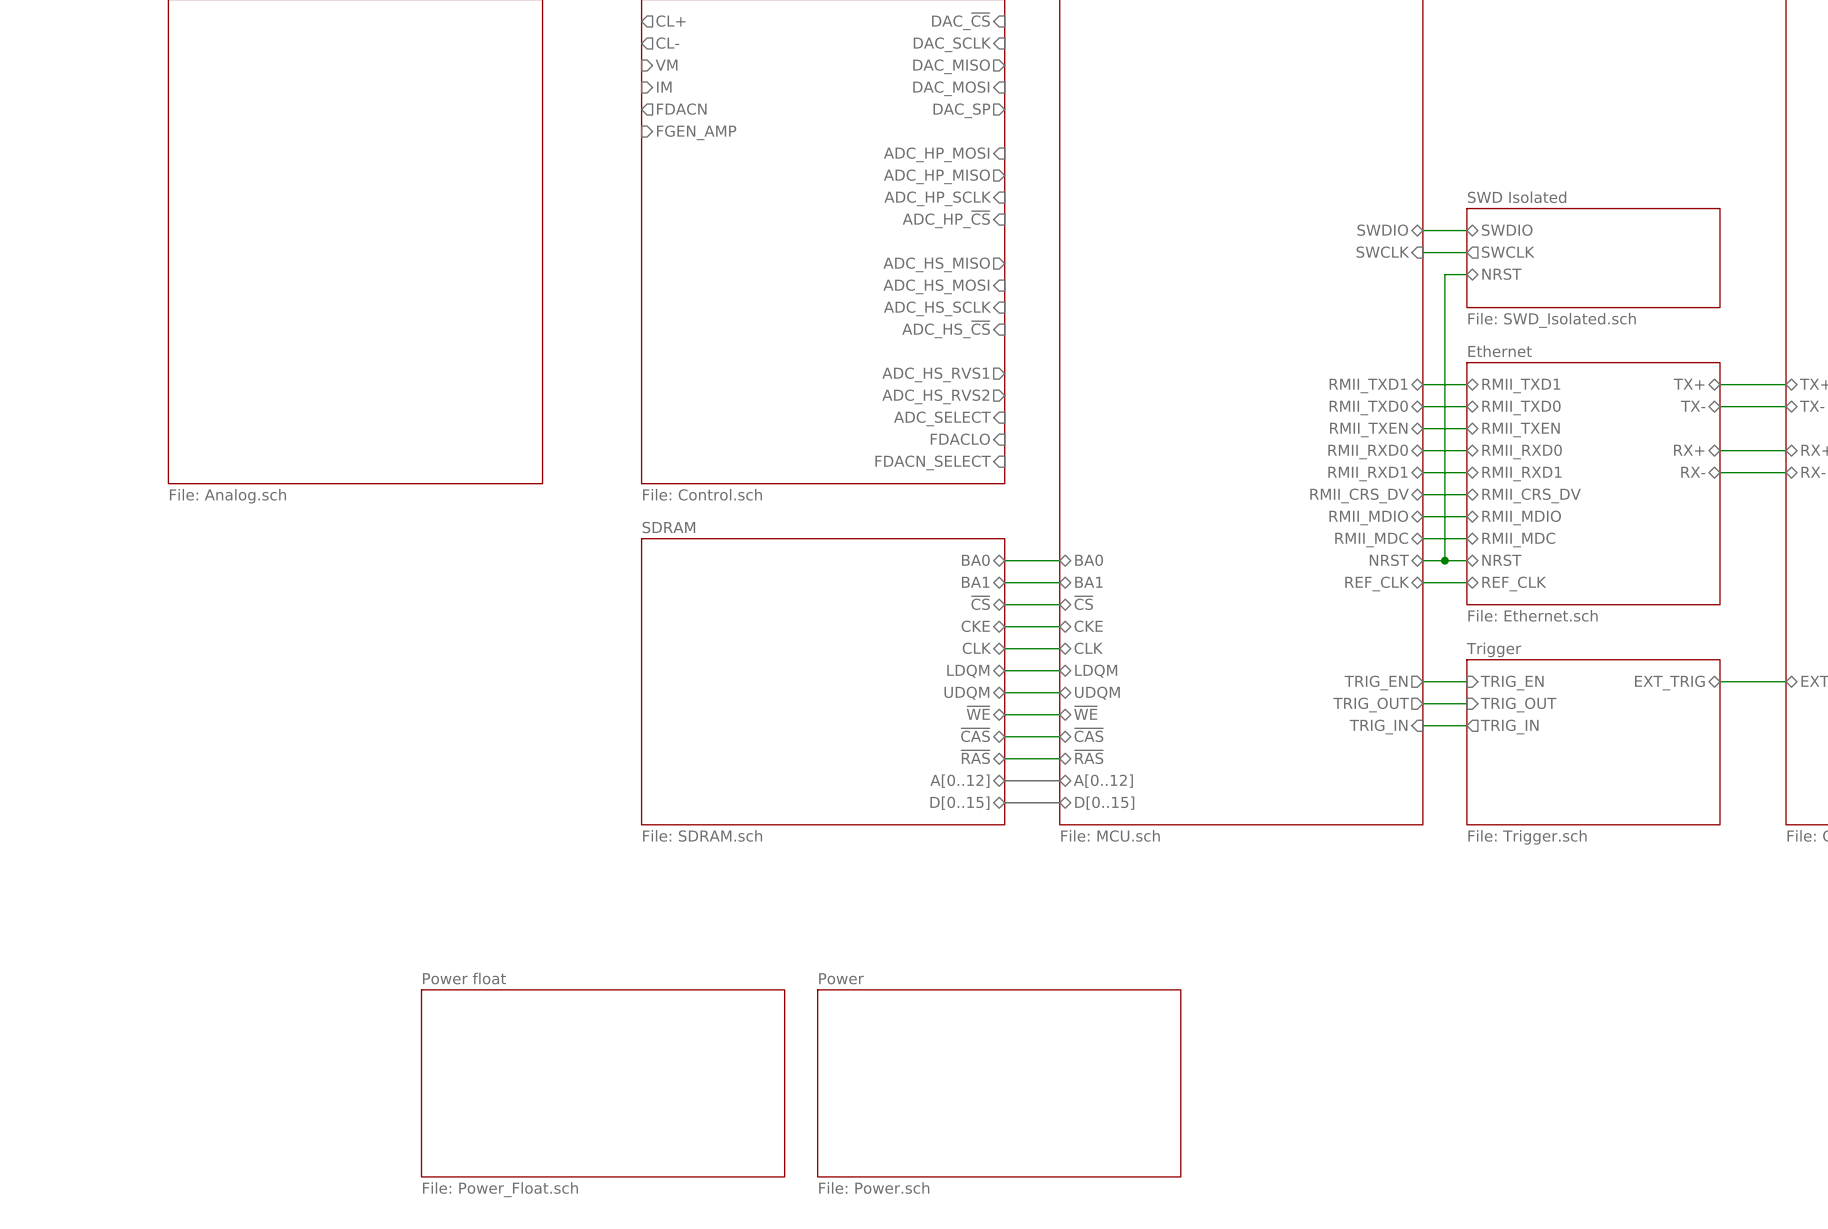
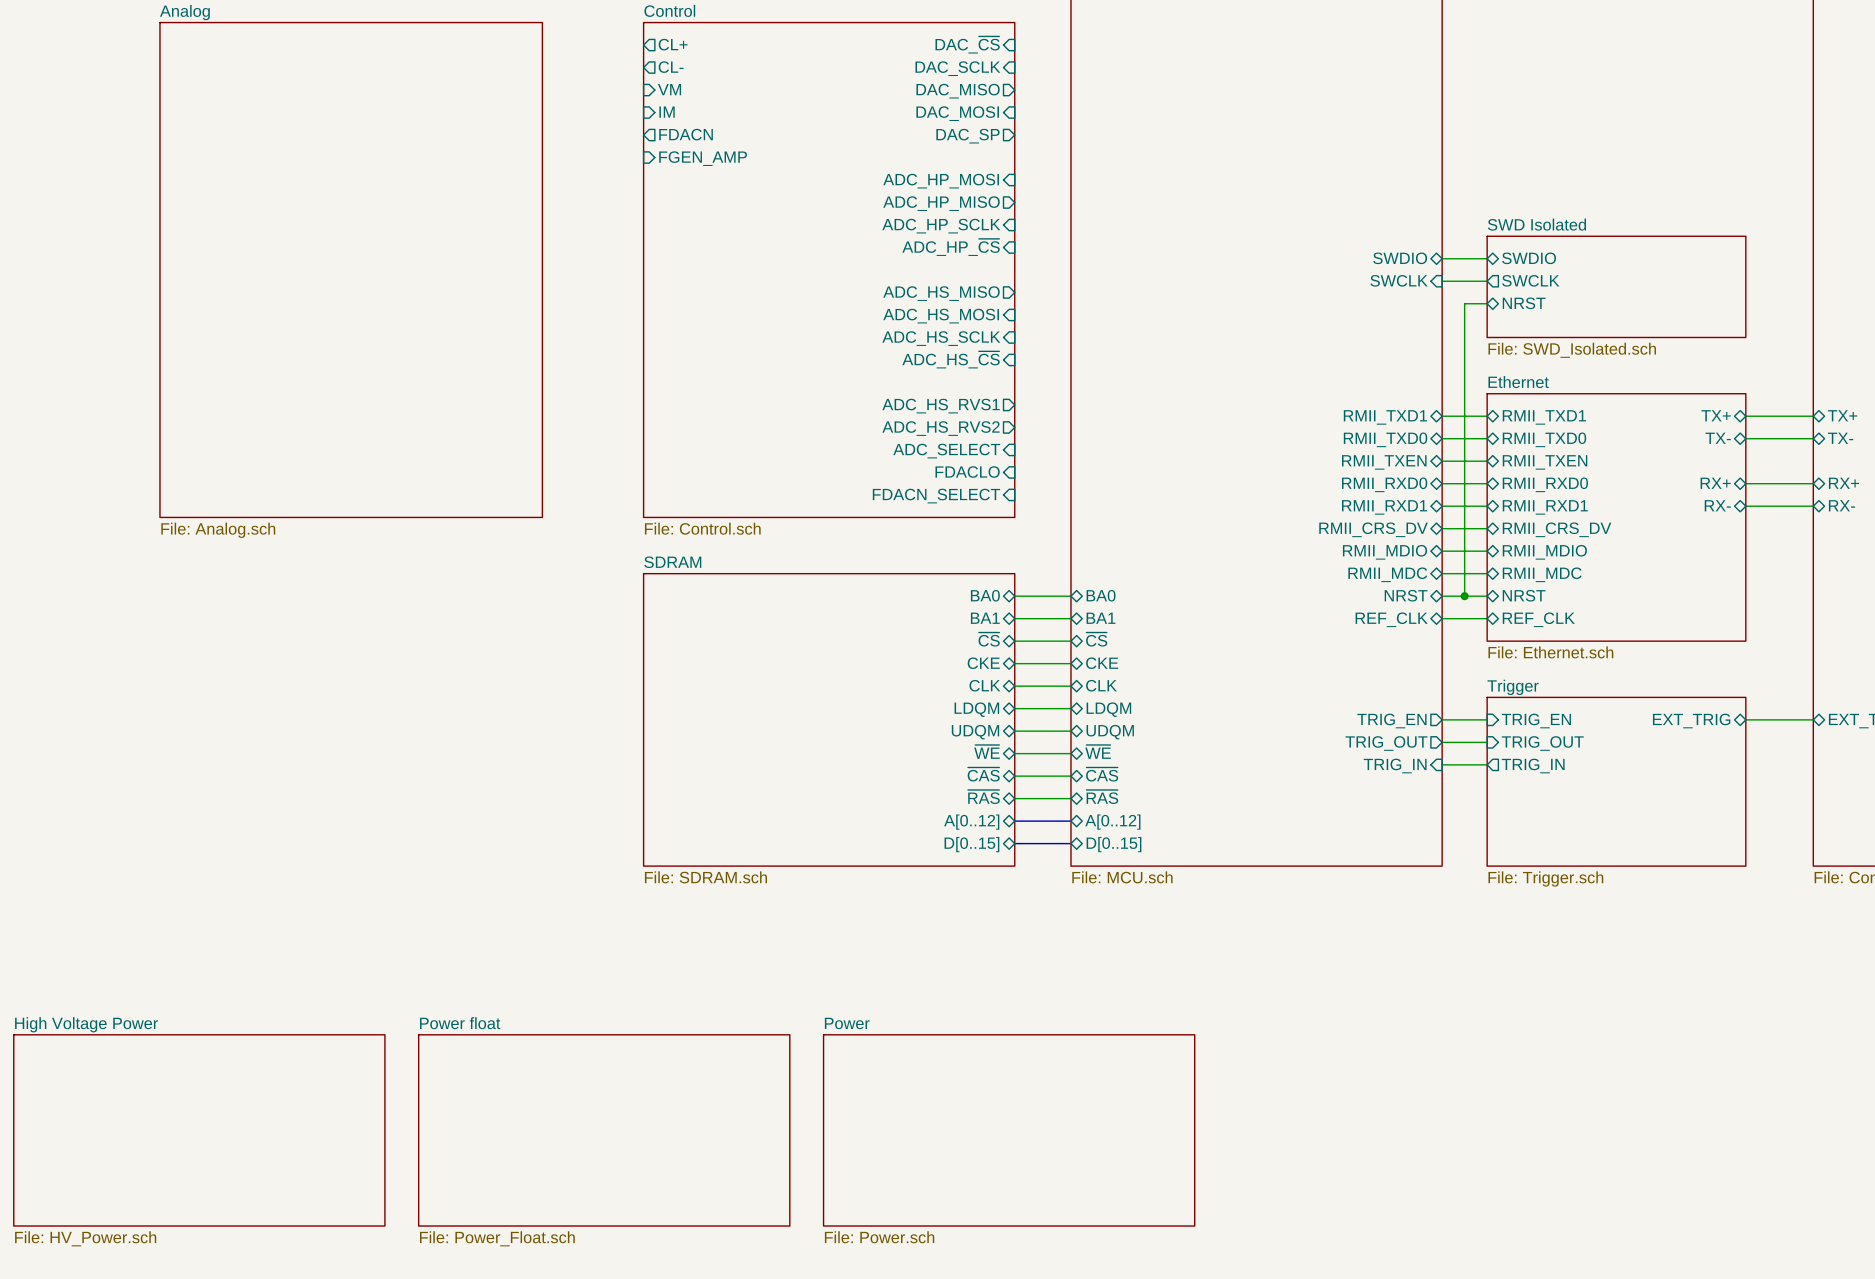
sheet High Voltage Power: none -> File: HV_Power.sch (199, 1130)

